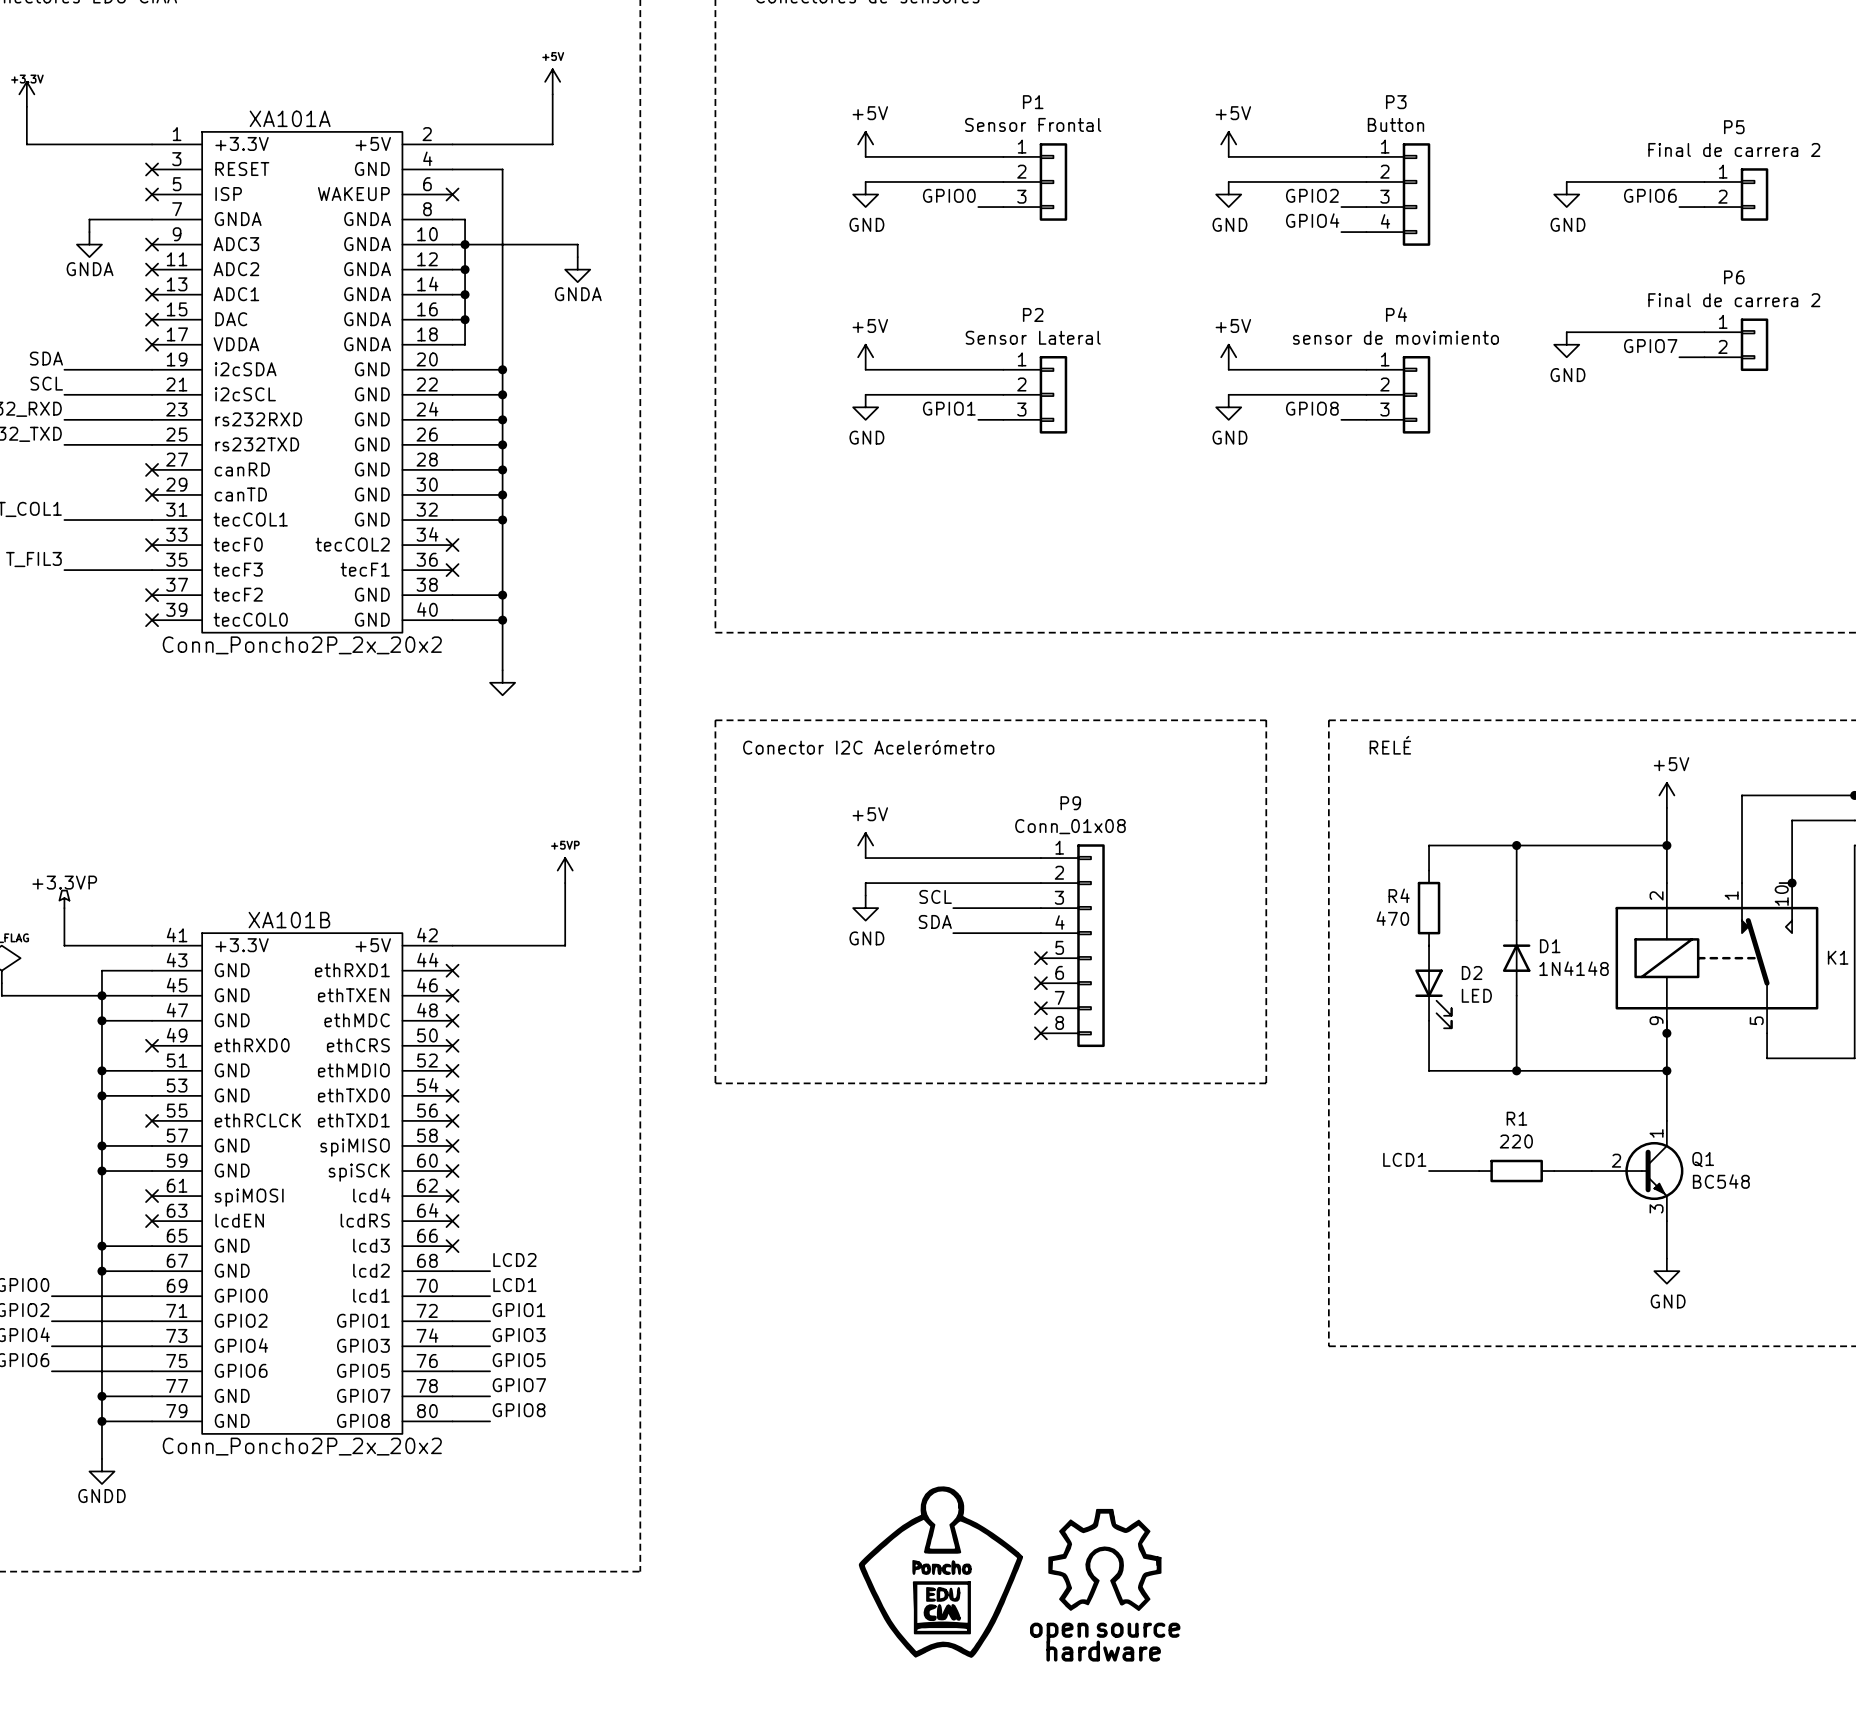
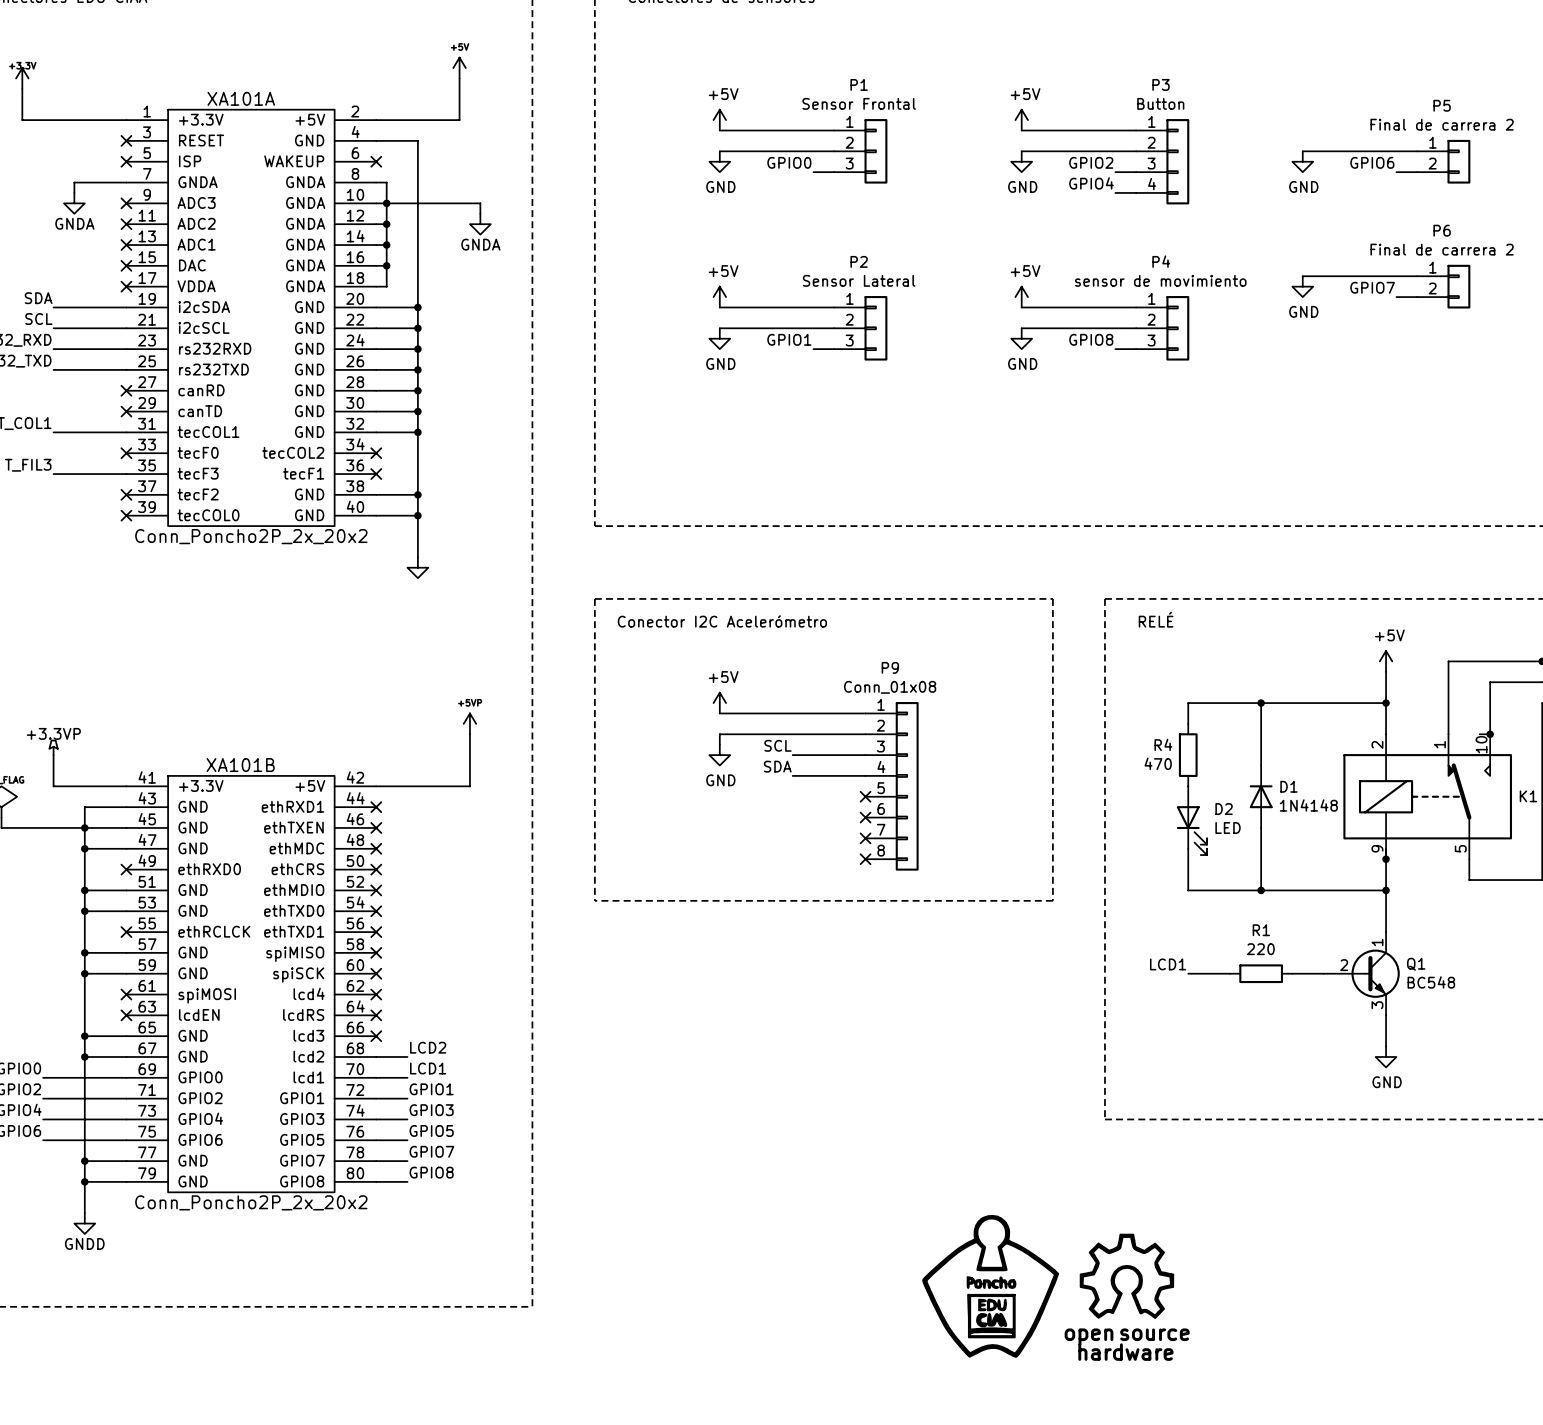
power symbol: none -> (1126, 1276)
power symbol: none -> (990, 1286)
power symbol: (1104, 1559) -> none
power symbol: (940, 1572) -> none

